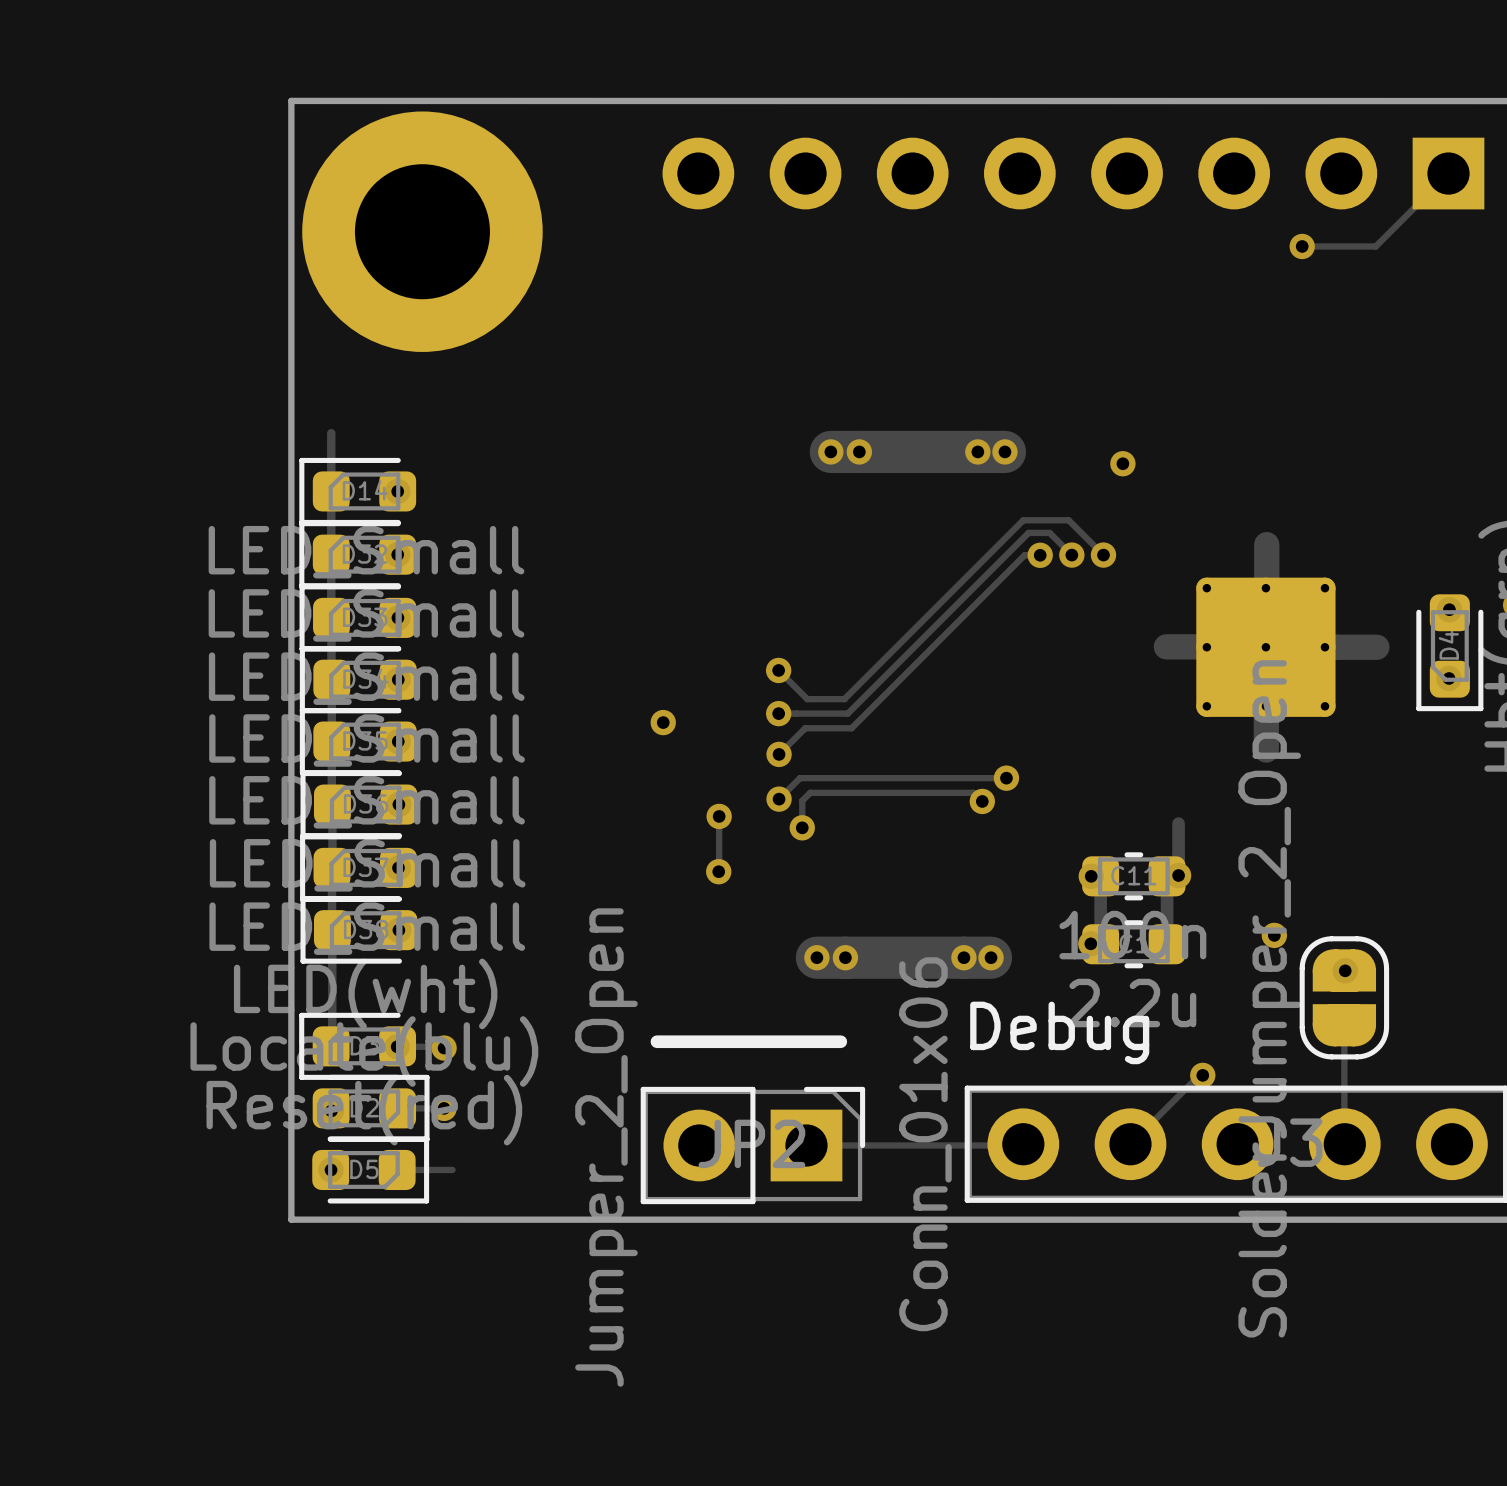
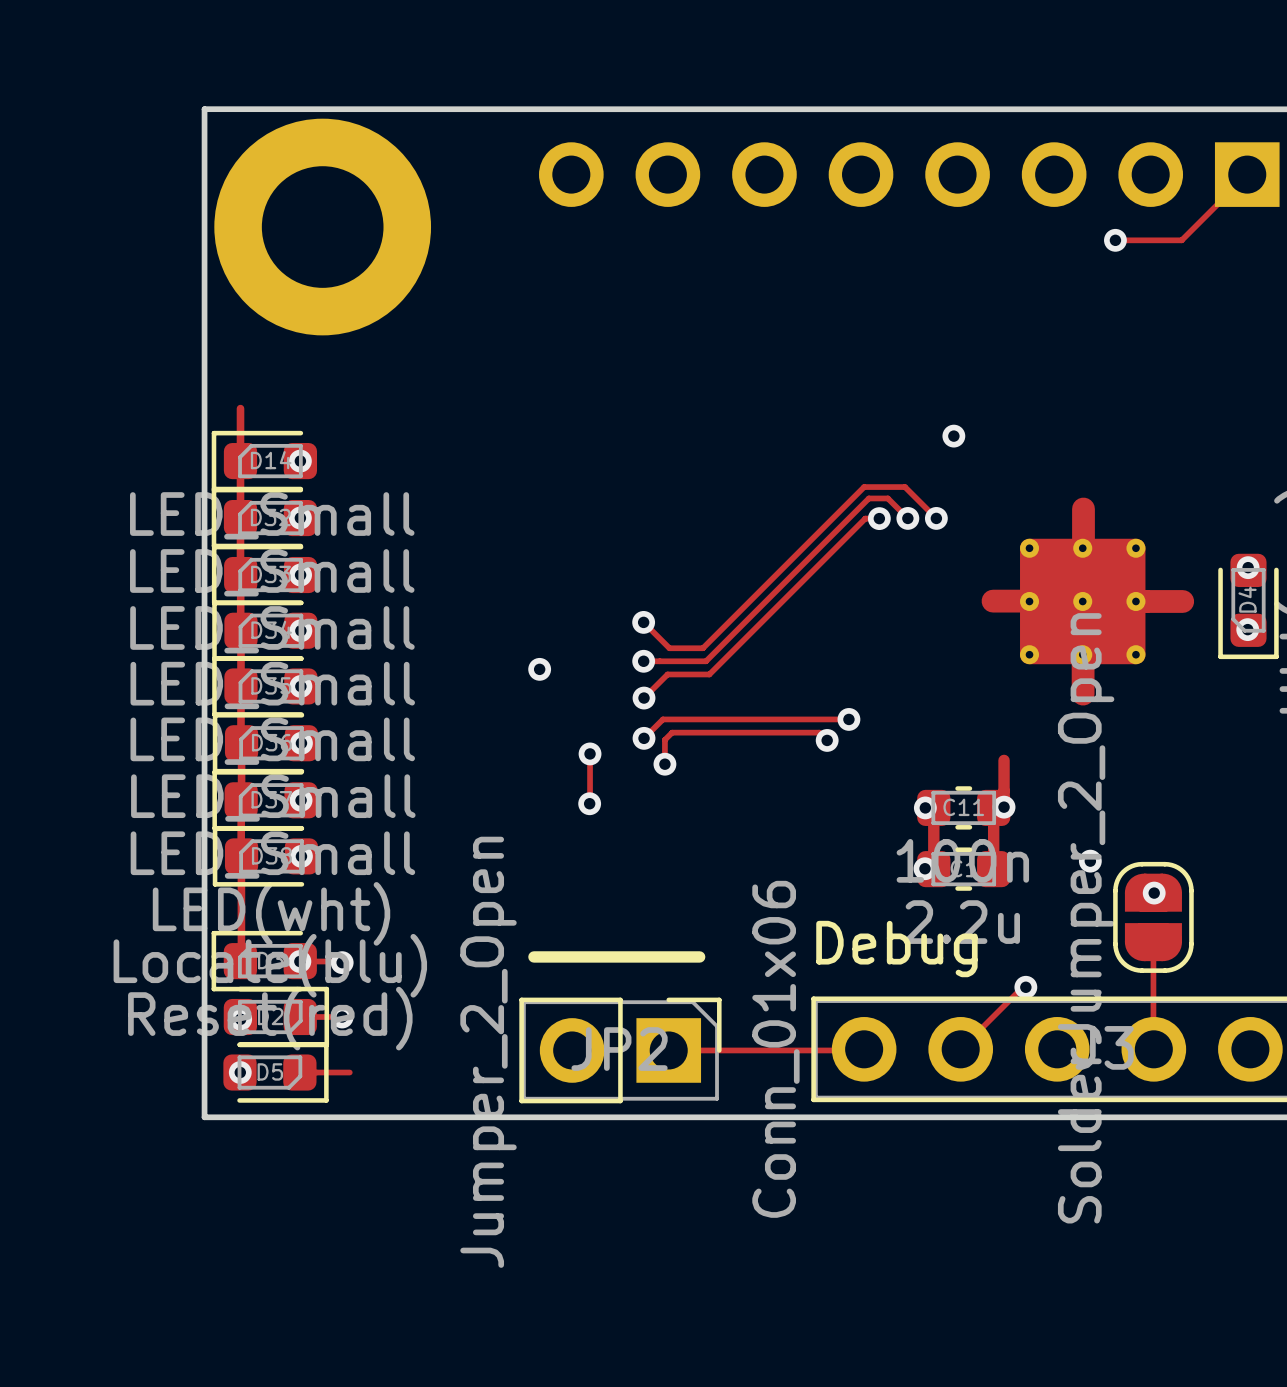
track: (830, 451) (1004, 451) -> none
via: (830, 451) -> none
via: (859, 451) -> none
via: (977, 451) -> none
via: (1004, 451) -> none
track: (816, 957) (991, 957) -> none
via: (816, 957) -> none
via: (845, 957) -> none
via: (963, 957) -> none
via: (991, 957) -> none

